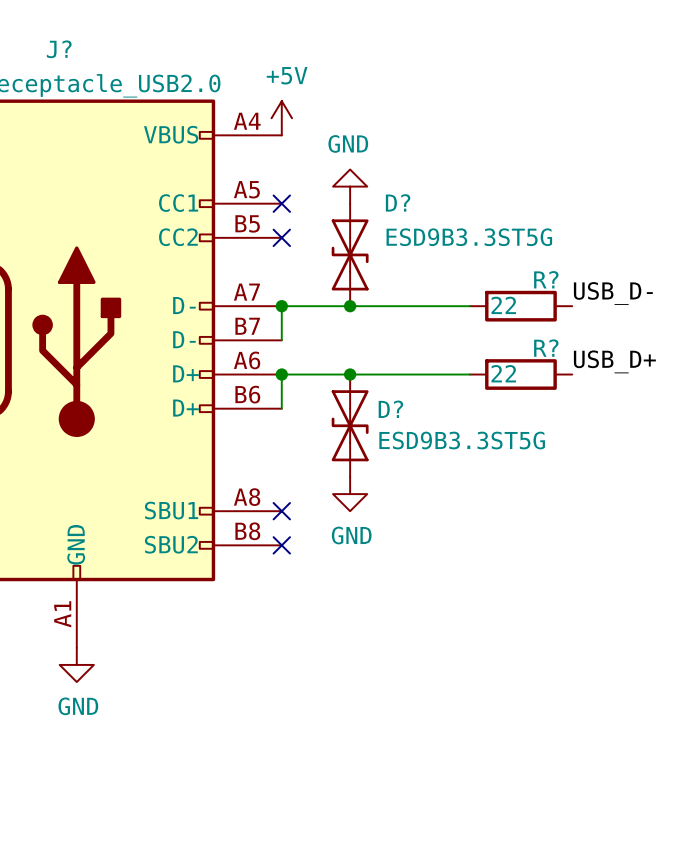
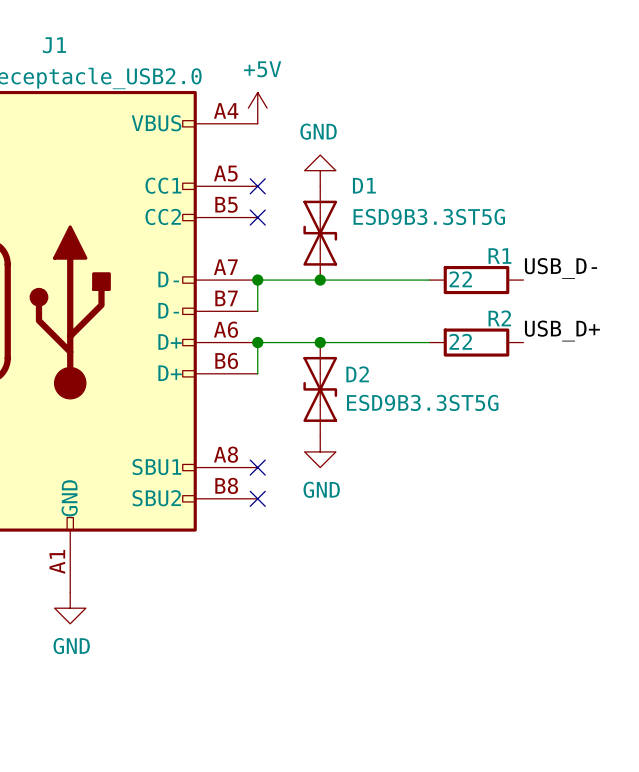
J? name: J? (59, 49) -> J1 (54, 45)
D? name: D? (398, 202) -> D1 (364, 185)
R? name: R? (546, 279) -> R1 (499, 256)
R? name: R? (546, 348) -> R2 (499, 318)
D? name: D? (390, 409) -> D2 (357, 374)

